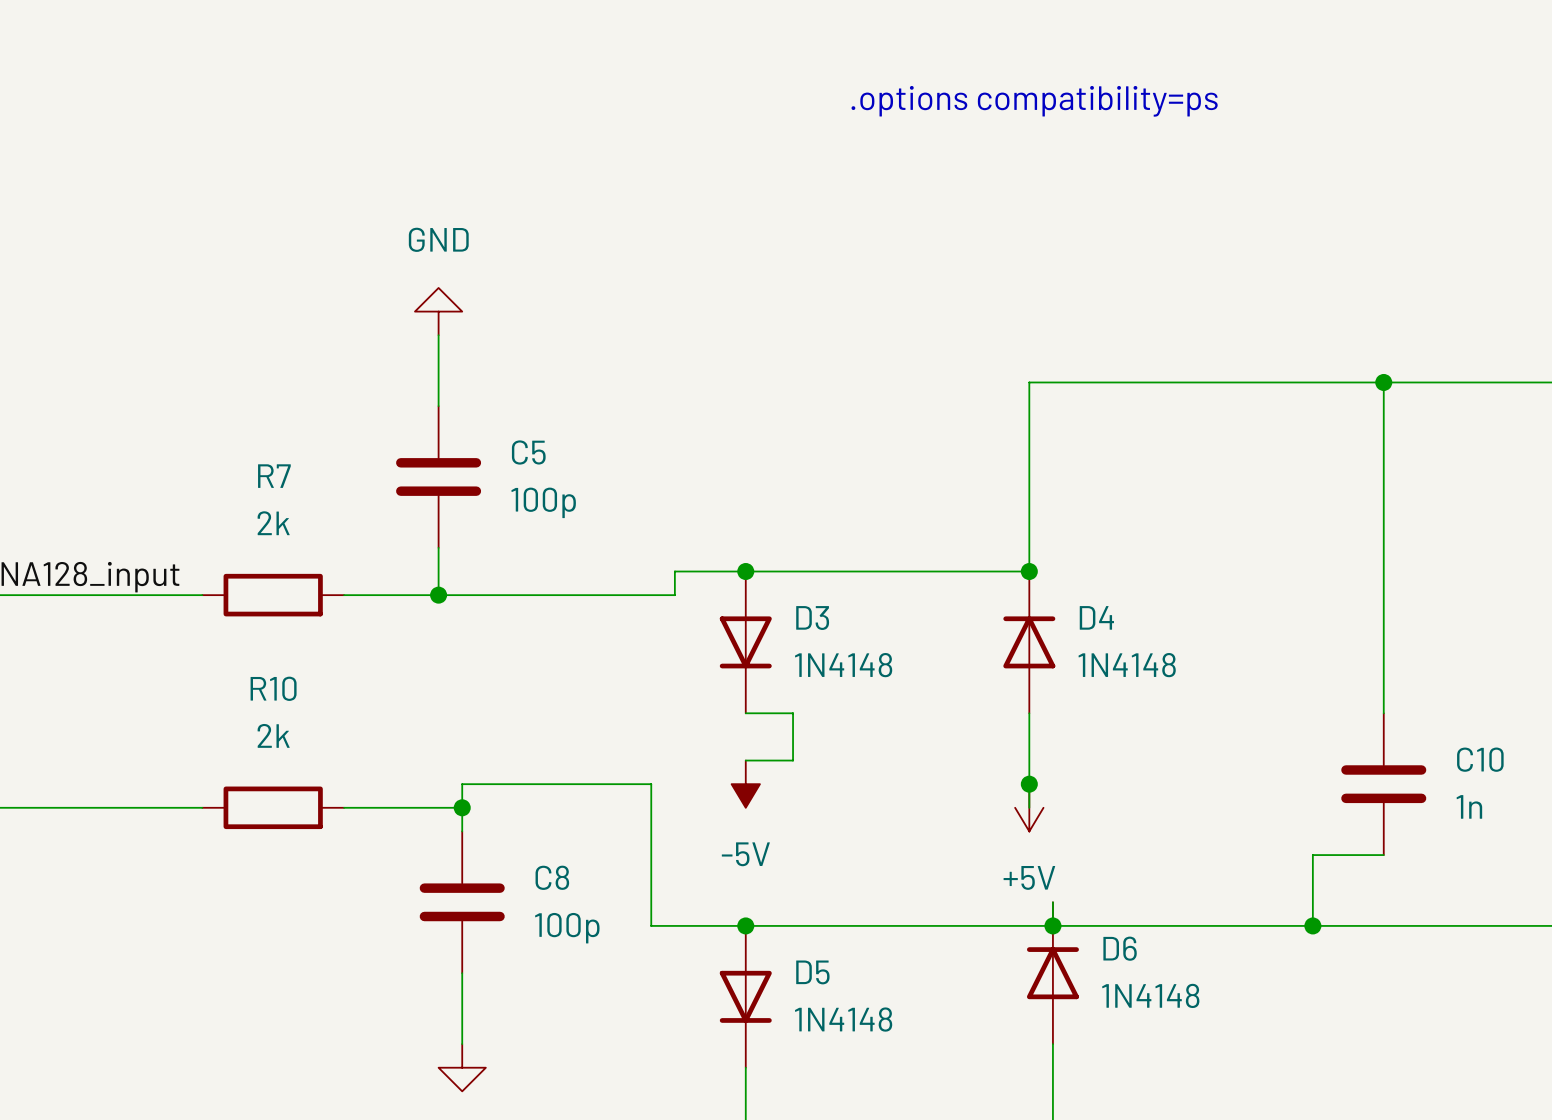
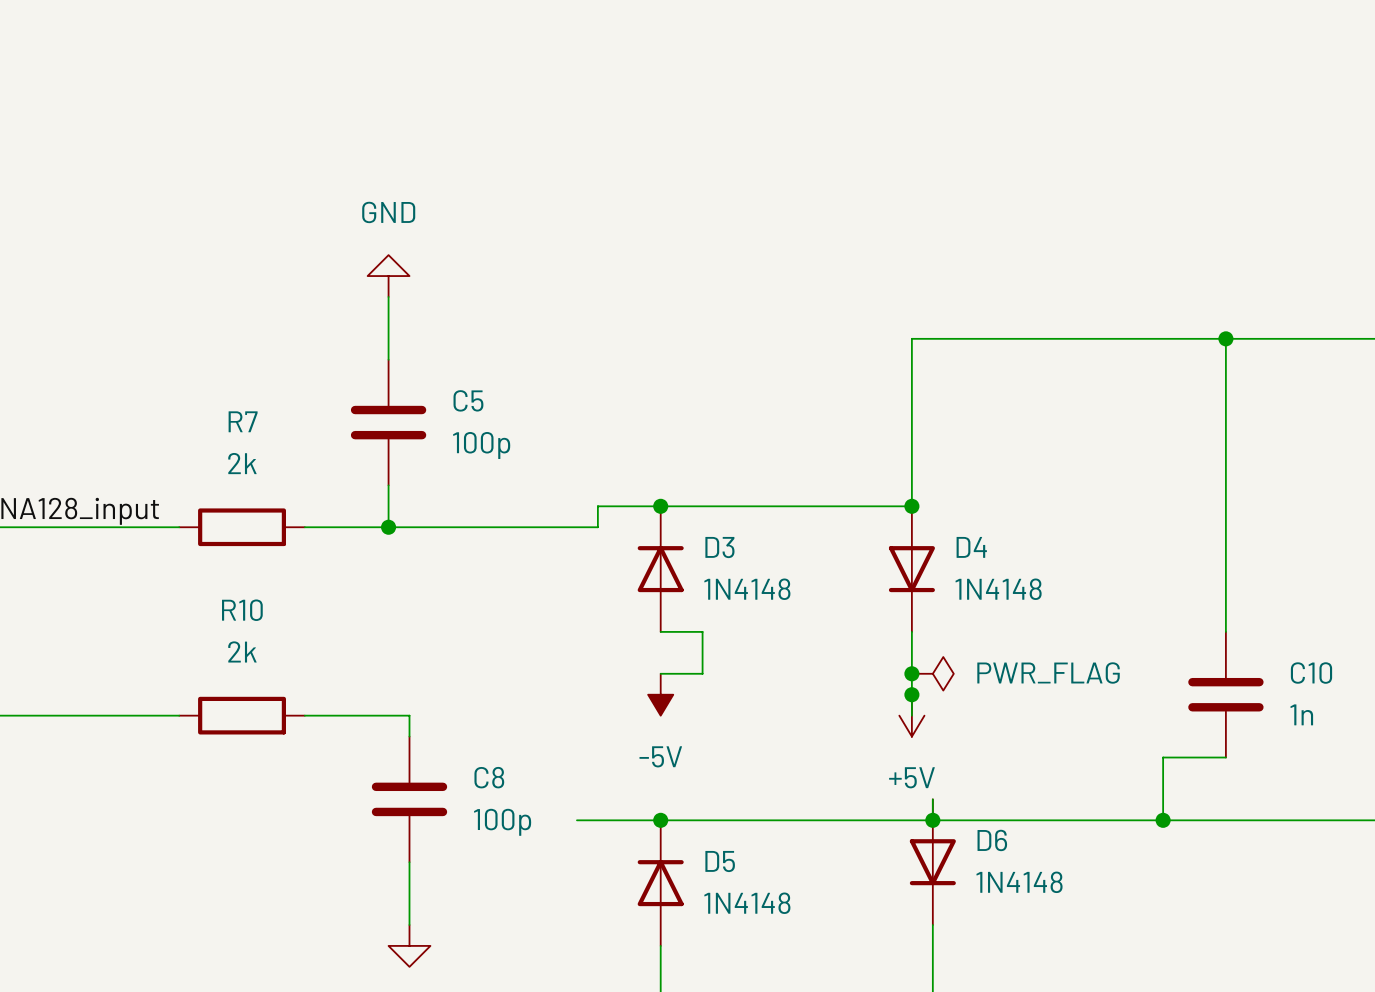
text: .options compatibility=ps (1034, 101) -> none
D3 rotation: 0° (745, 642) -> 180° (660, 569)
D4 rotation: 0° (1029, 642) -> 180° (911, 569)
junction: none -> (911, 673)
power symbol: none -> PWR_FLAG (932, 673)
wire: (462, 807) (462, 784) (651, 784) (651, 925) -> none
junction: (462, 807) -> none
D6 rotation: 0° (1052, 973) -> 180° (932, 862)
D5 rotation: 0° (745, 996) -> 180° (660, 883)

